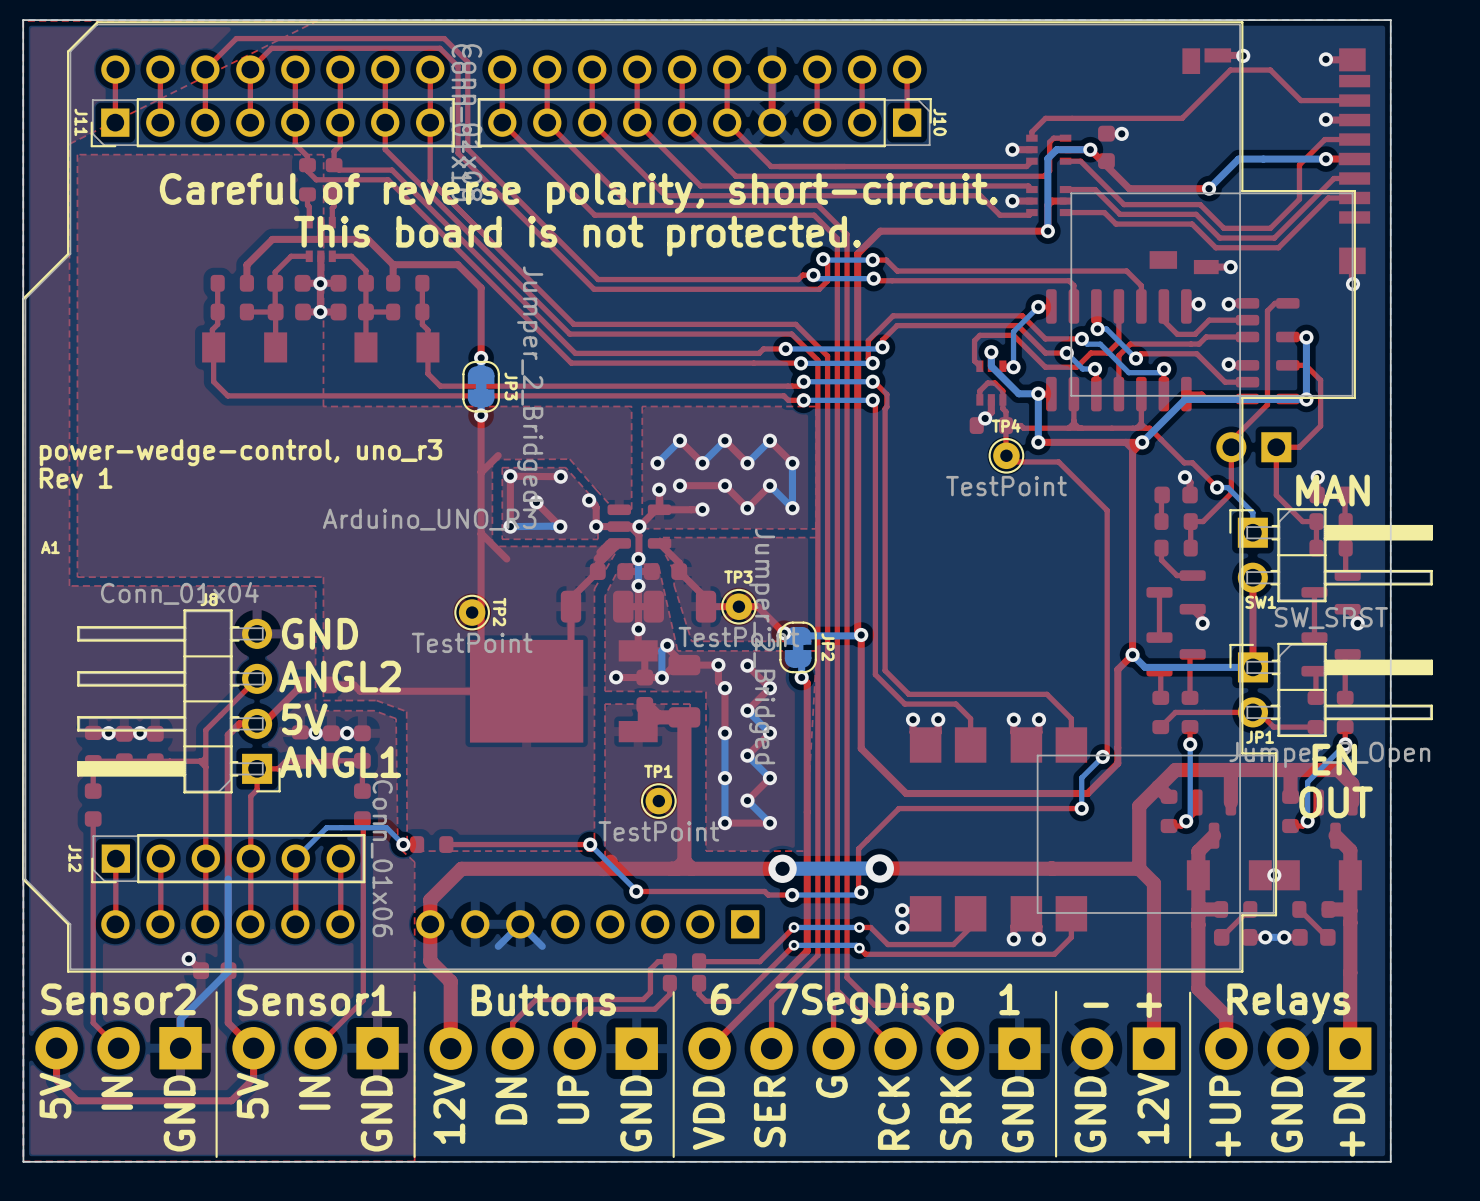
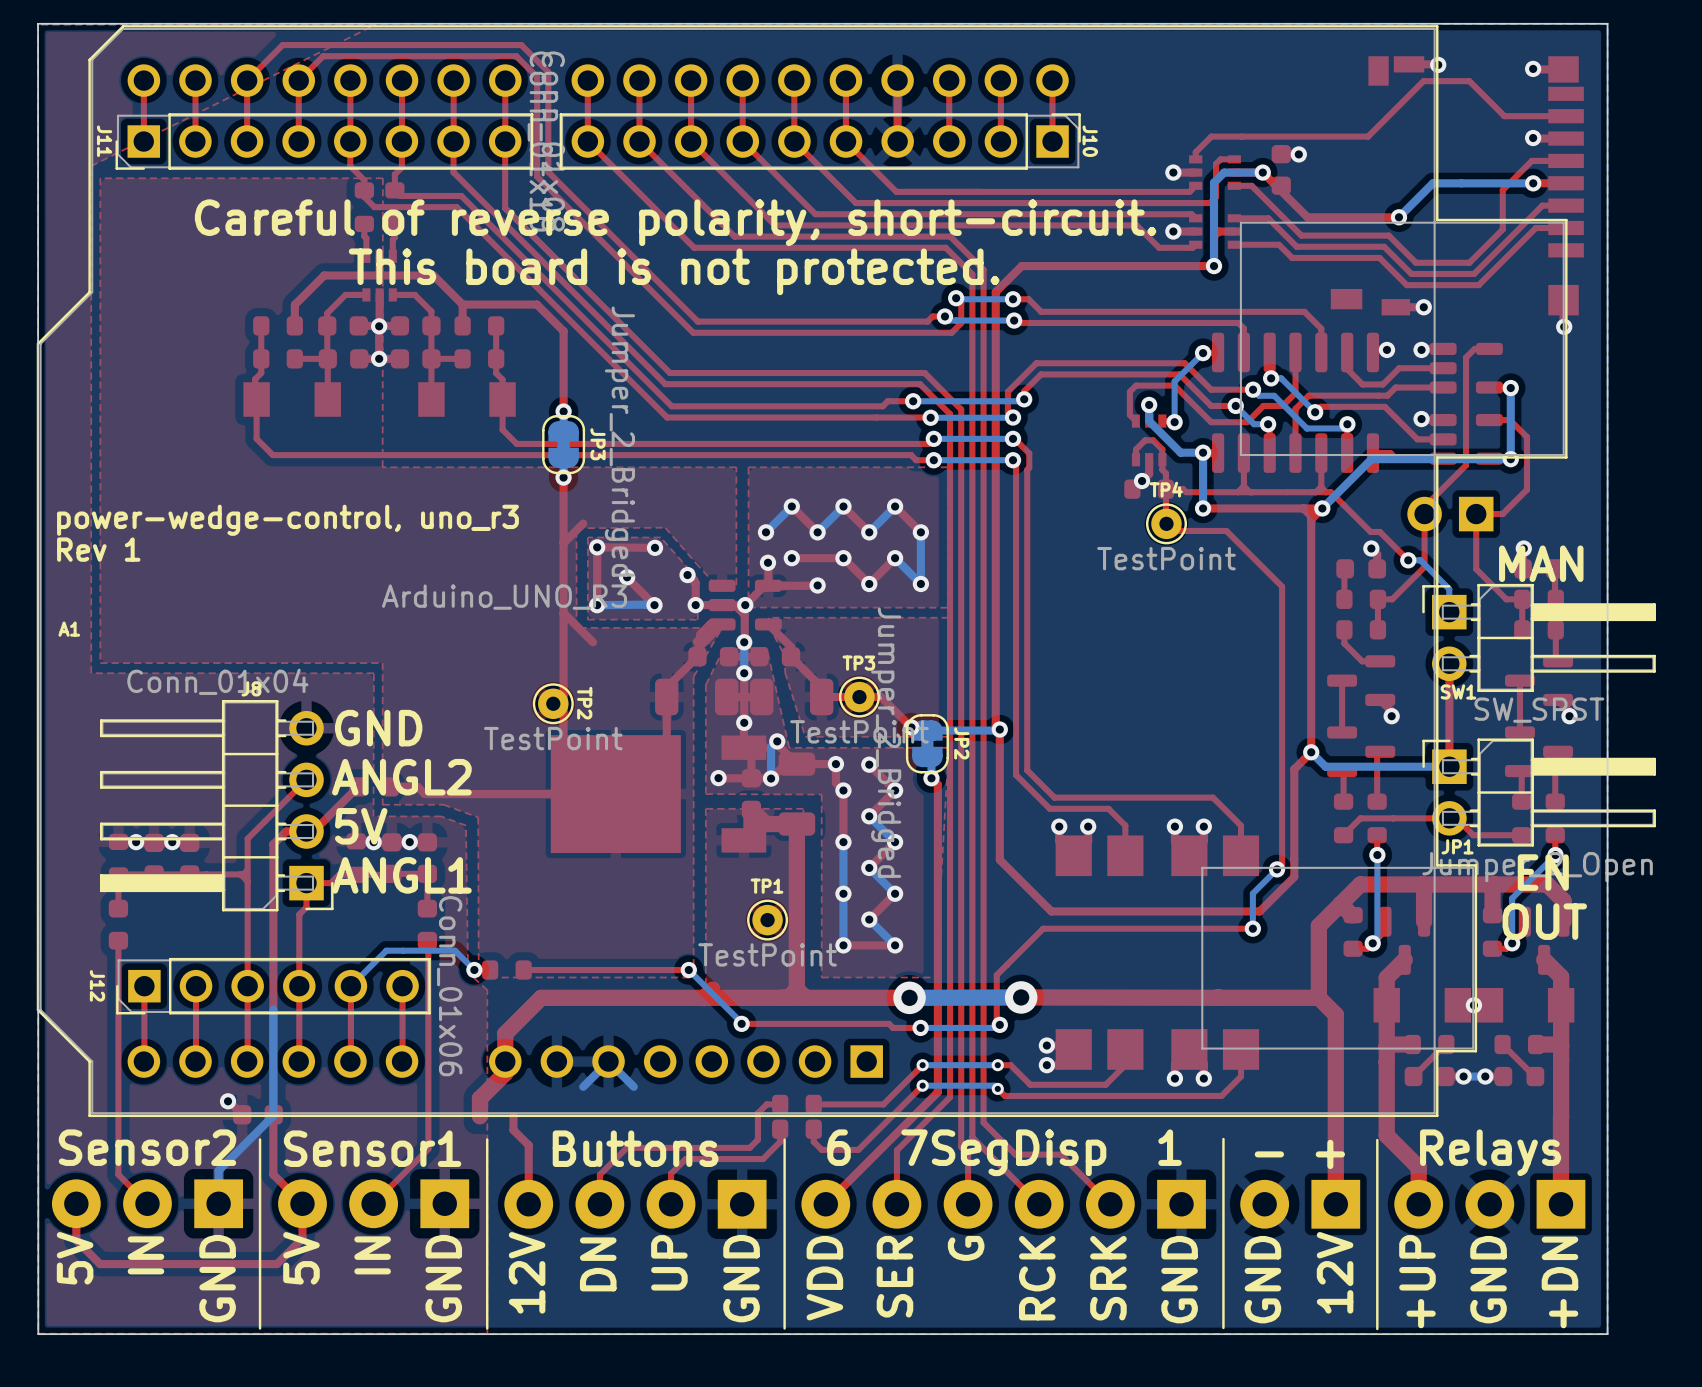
top track: (430, 934) (430, 961) (450, 981) (450, 997) -> (513, 1116) (513, 1130) (528, 1145)
top track: none -> (505, 1073) (479, 1098) (479, 1116)
top track width: thick (450, 997) (450, 1048) -> thin (528, 1145) (528, 1204)

